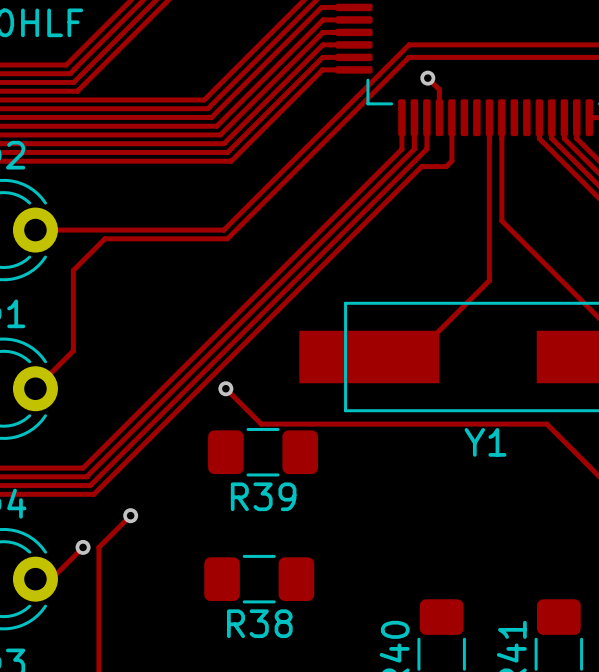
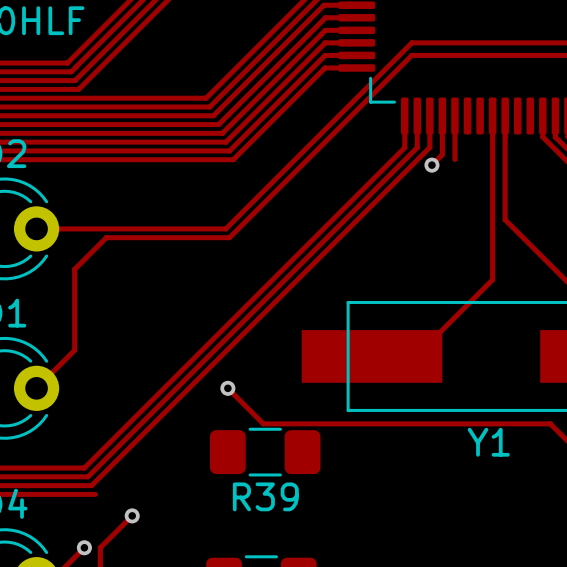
top track: (427, 78) (439, 89) (439, 117) -> (431, 165) (442, 154) (442, 115)
via position: (427, 78) -> (431, 165)
top track: (451, 160) (446, 166) (421, 166) (93, 494) -> none

